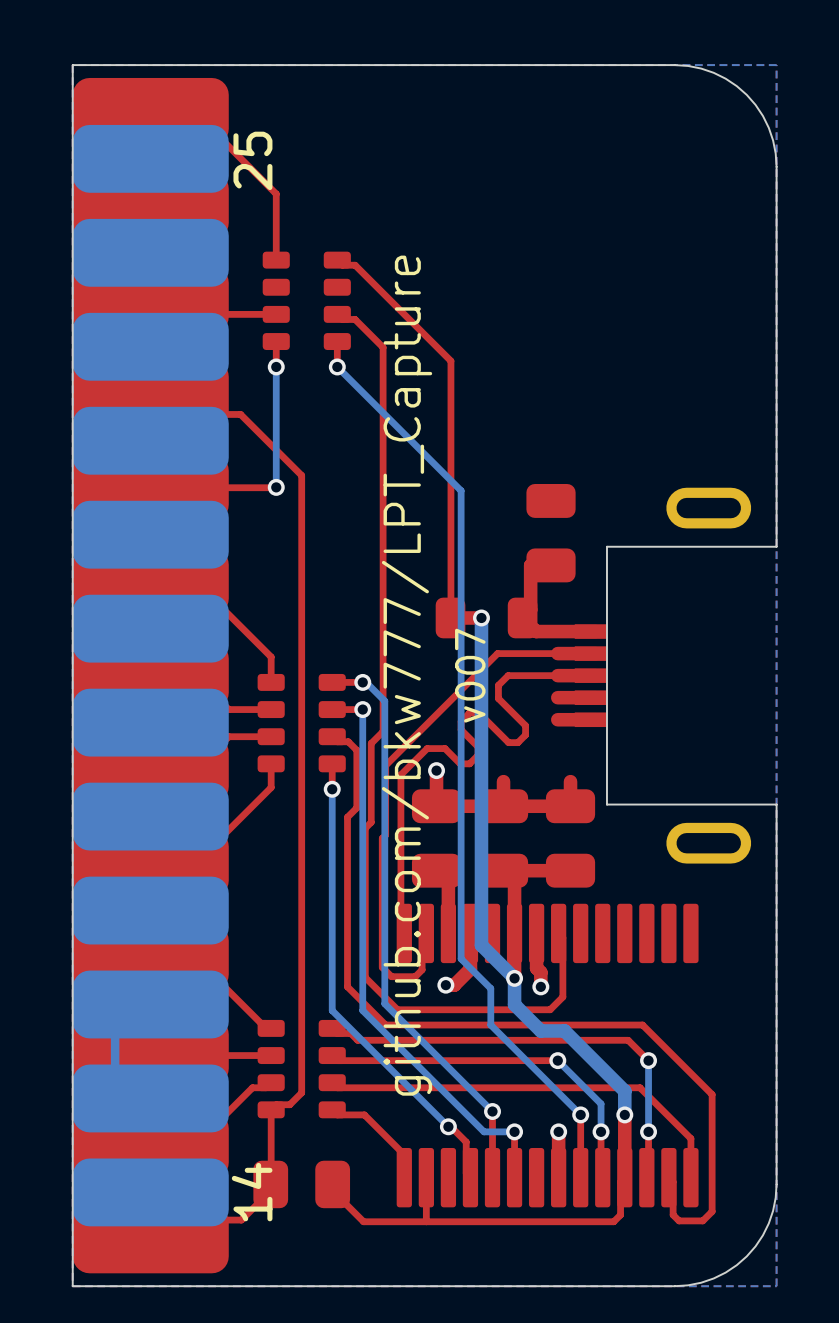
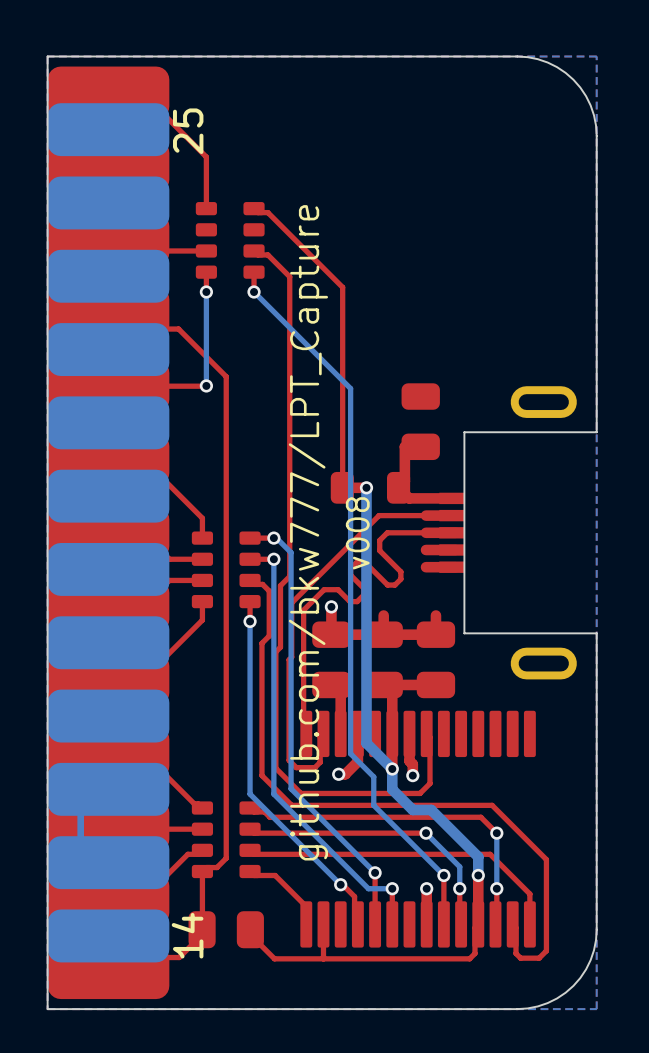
text: v007 (470, 675) -> v008 (357, 533)

